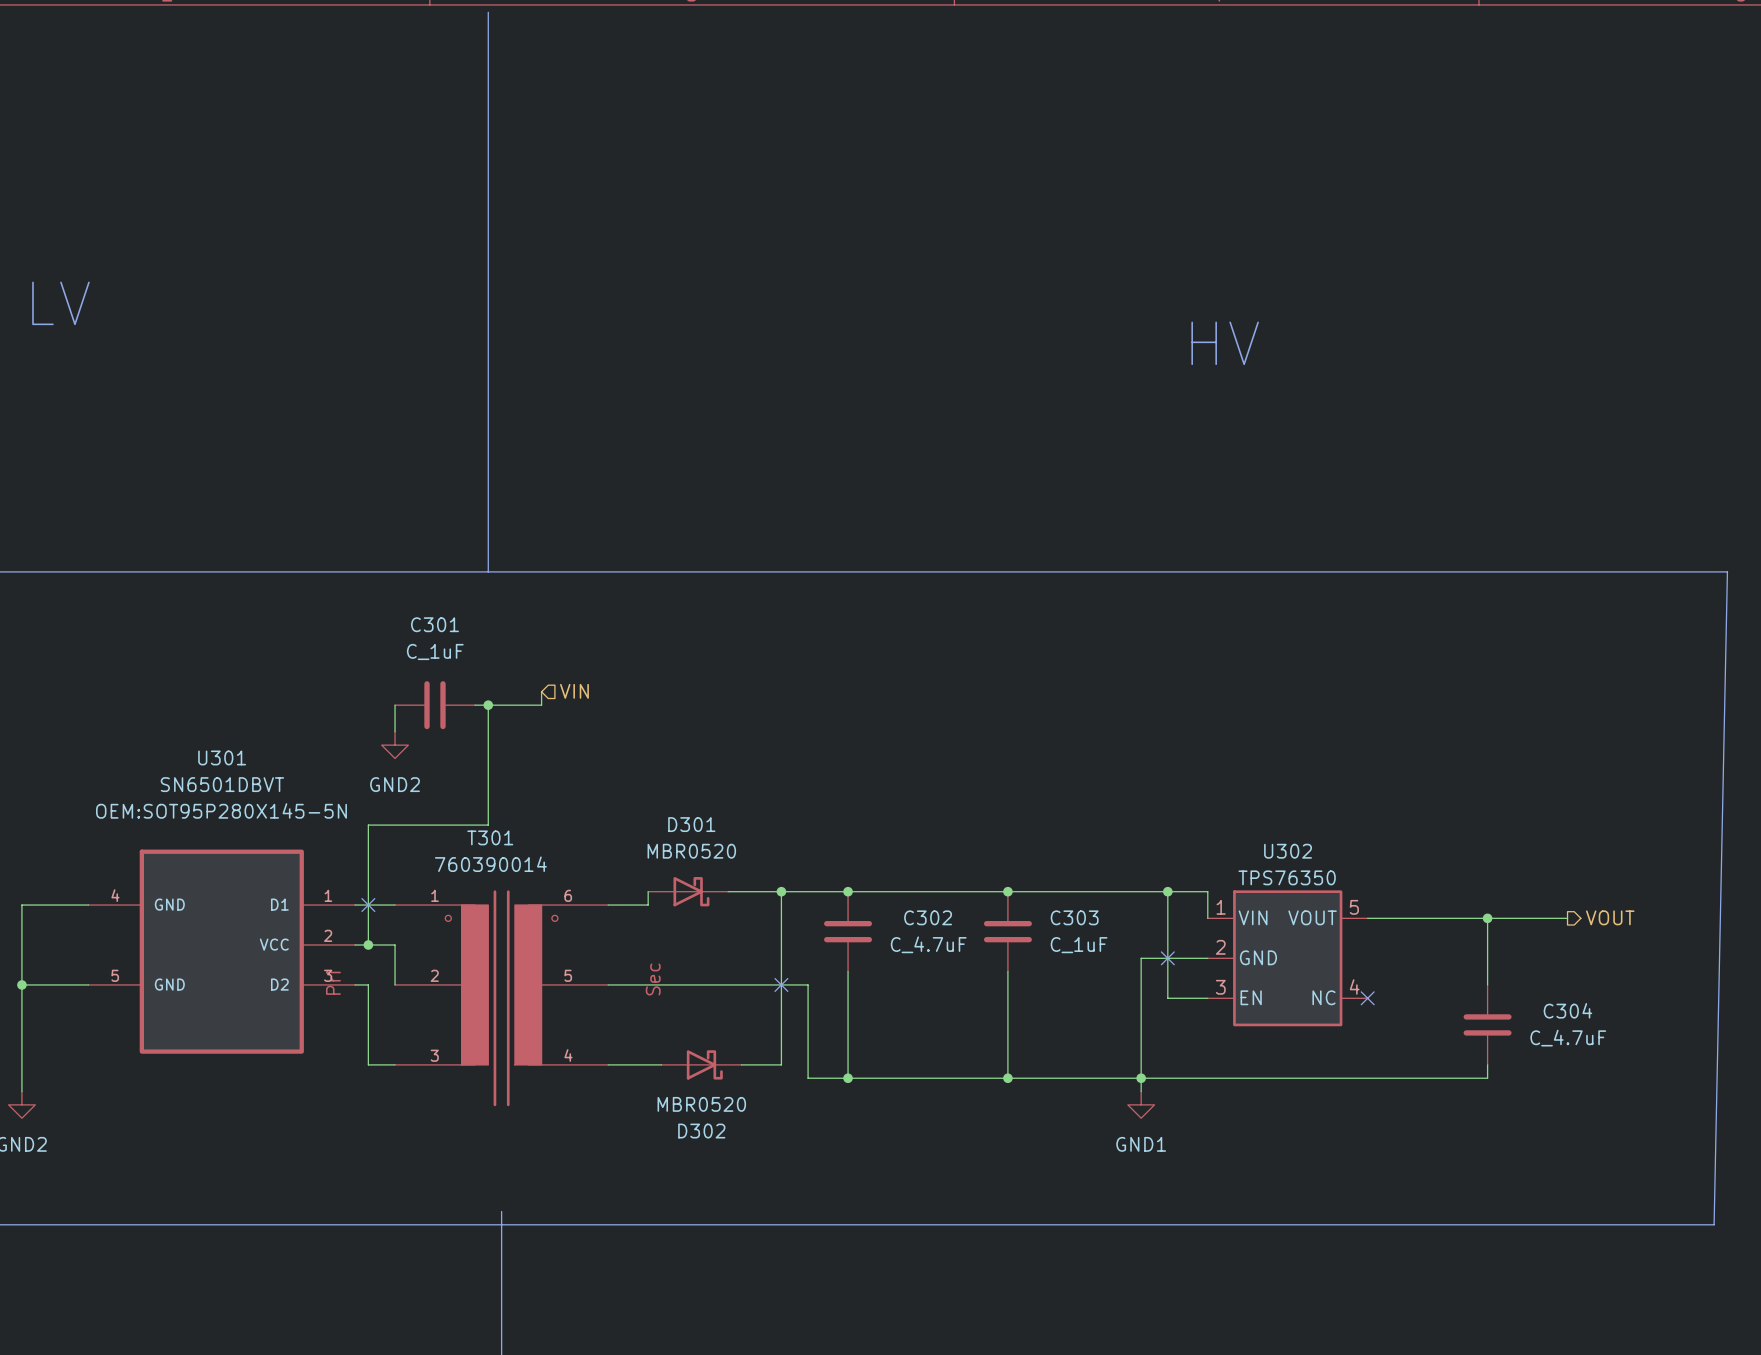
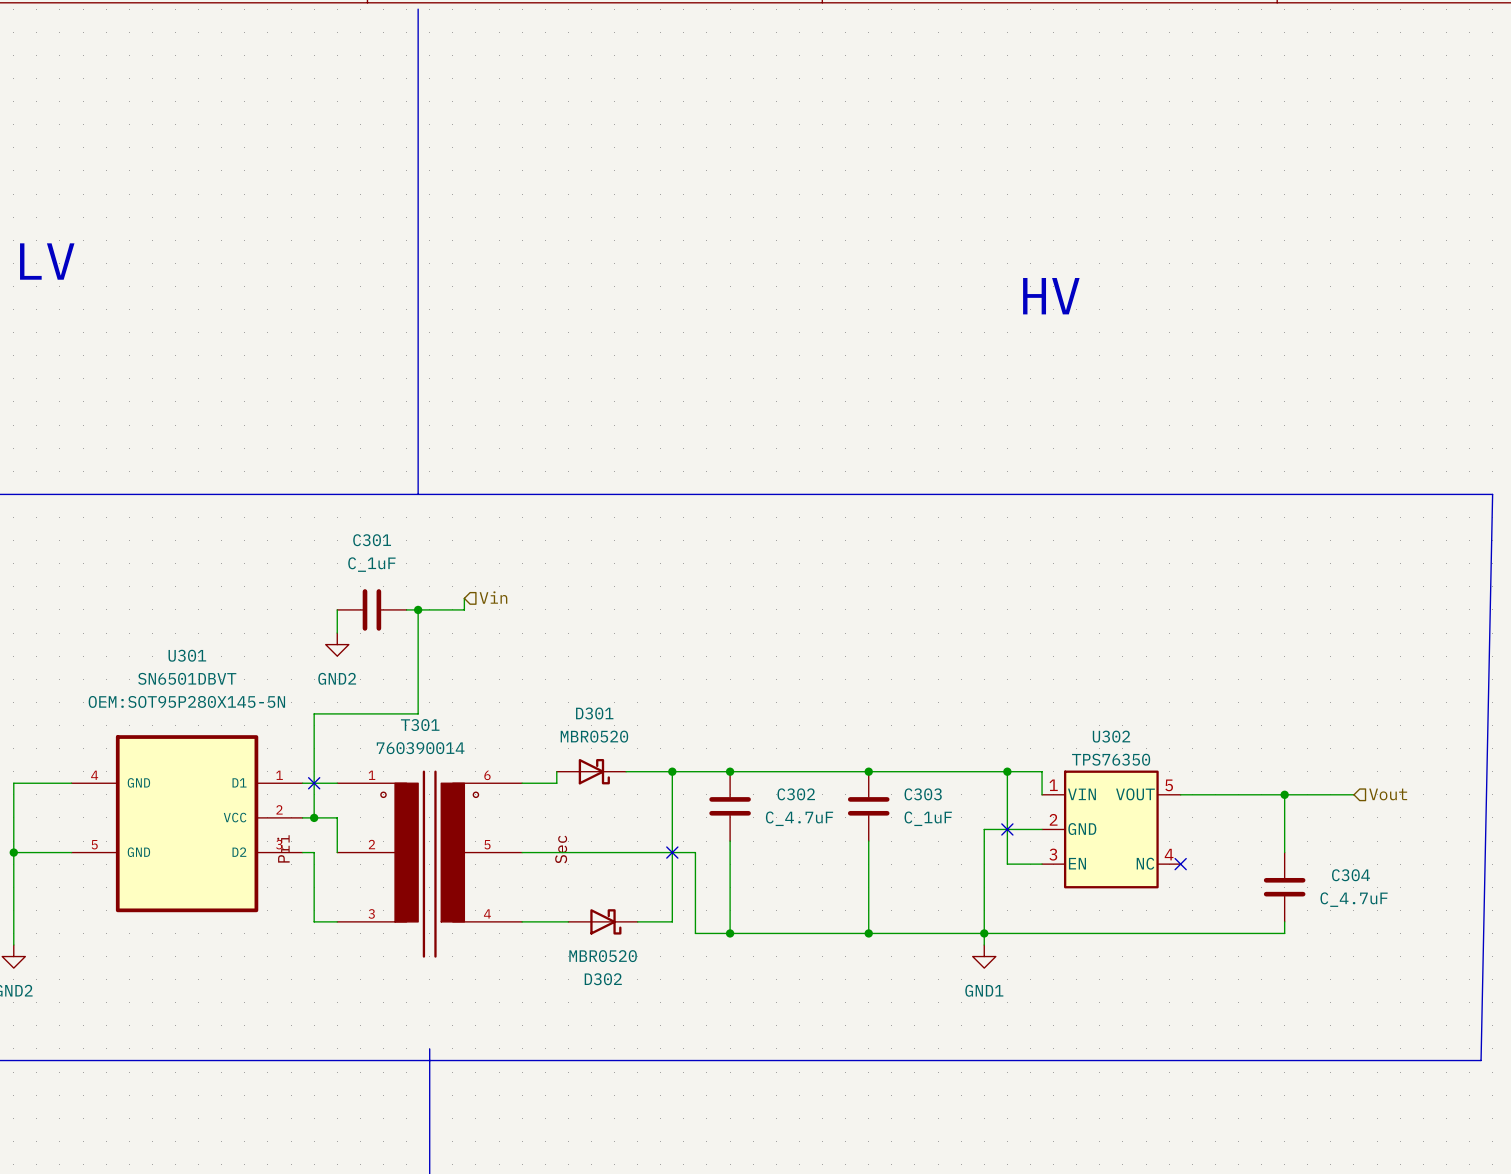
hierarchical label: VIN (574, 691) -> Vin (493, 597)
hierarchical label shape: output (1610, 917) -> input (1388, 794)
hierarchical label: VOUT (1610, 917) -> Vout (1388, 794)

